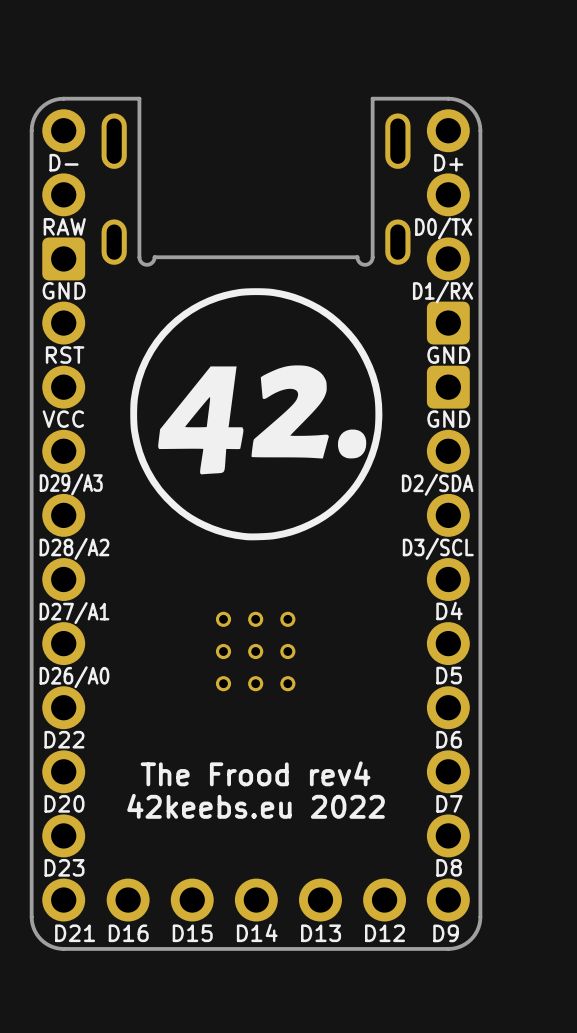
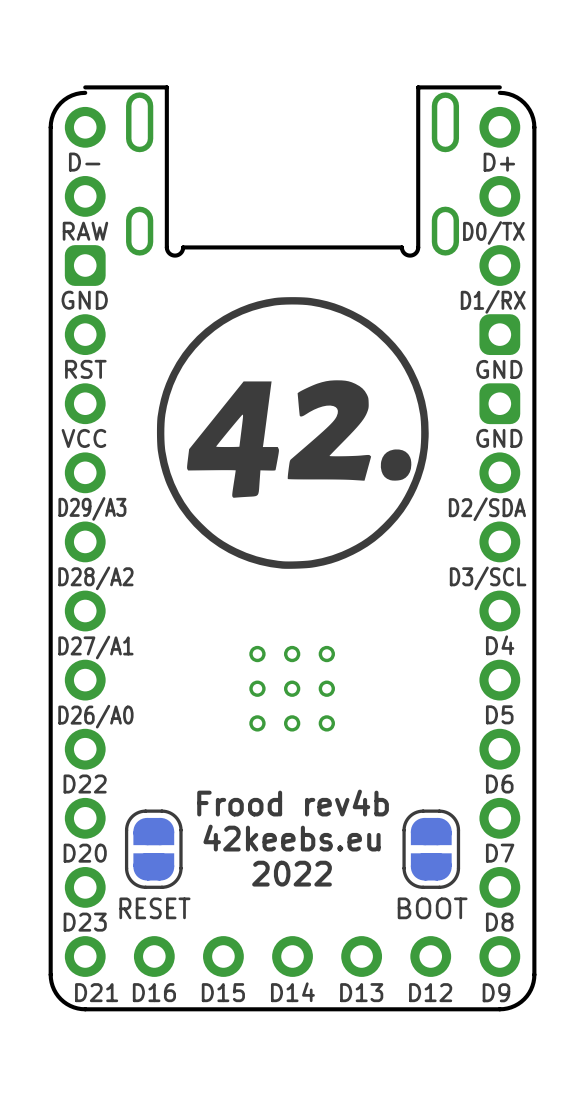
part footprint: [61, 96, 451, 267] -> [83, 85, 502, 258]
text: D- (64, 162) -> none
text: D+ (448, 162) -> none
text: RAW (64, 226) -> none
text: D0/TX (443, 228) -> none
text: GND (64, 290) -> none
text: D1/RX (443, 292) -> none
text: RST (65, 355) -> none
text: GND (448, 355) -> none
text: VCC (63, 419) -> none
text: GND (448, 419) -> none
text: D29/A3 (71, 484) -> none
text: D2/SDA (437, 484) -> none
part: (63, 515) -> none
part: none -> (292, 541)
part: (448, 515) -> none
text: D28/A2 (74, 548) -> none
text: D3/SCL (438, 548) -> none
text: D4 (449, 611) -> none
text: D27/A1 (74, 613) -> none
text: D5 (449, 675) -> none
text: D26/A0 (74, 677) -> none
text: D22 (64, 739) -> none
text: D6 (449, 739) -> none
text: The Frood rev4 (255, 773) -> Frood rev4b (293, 803)
part: none -> RESET (153, 849)
part: none -> BOOT (431, 849)
text: D20 (64, 803) -> none
text: D7 (449, 803) -> none
text: 42keebs.eu 2022 (256, 806) -> 42keebs.eu (292, 838)
text: none -> 2022 (292, 873)
text: D23 (64, 867) -> none
text: D8 (449, 867) -> none
part: (256, 900) -> none
text: D14 (257, 932) -> none
text: D21 (75, 933) -> none
text: D16 (128, 933) -> none
text: D15 (192, 933) -> none
text: D13 (321, 933) -> none
text: D12 (385, 933) -> none
text: D9 (446, 933) -> none

